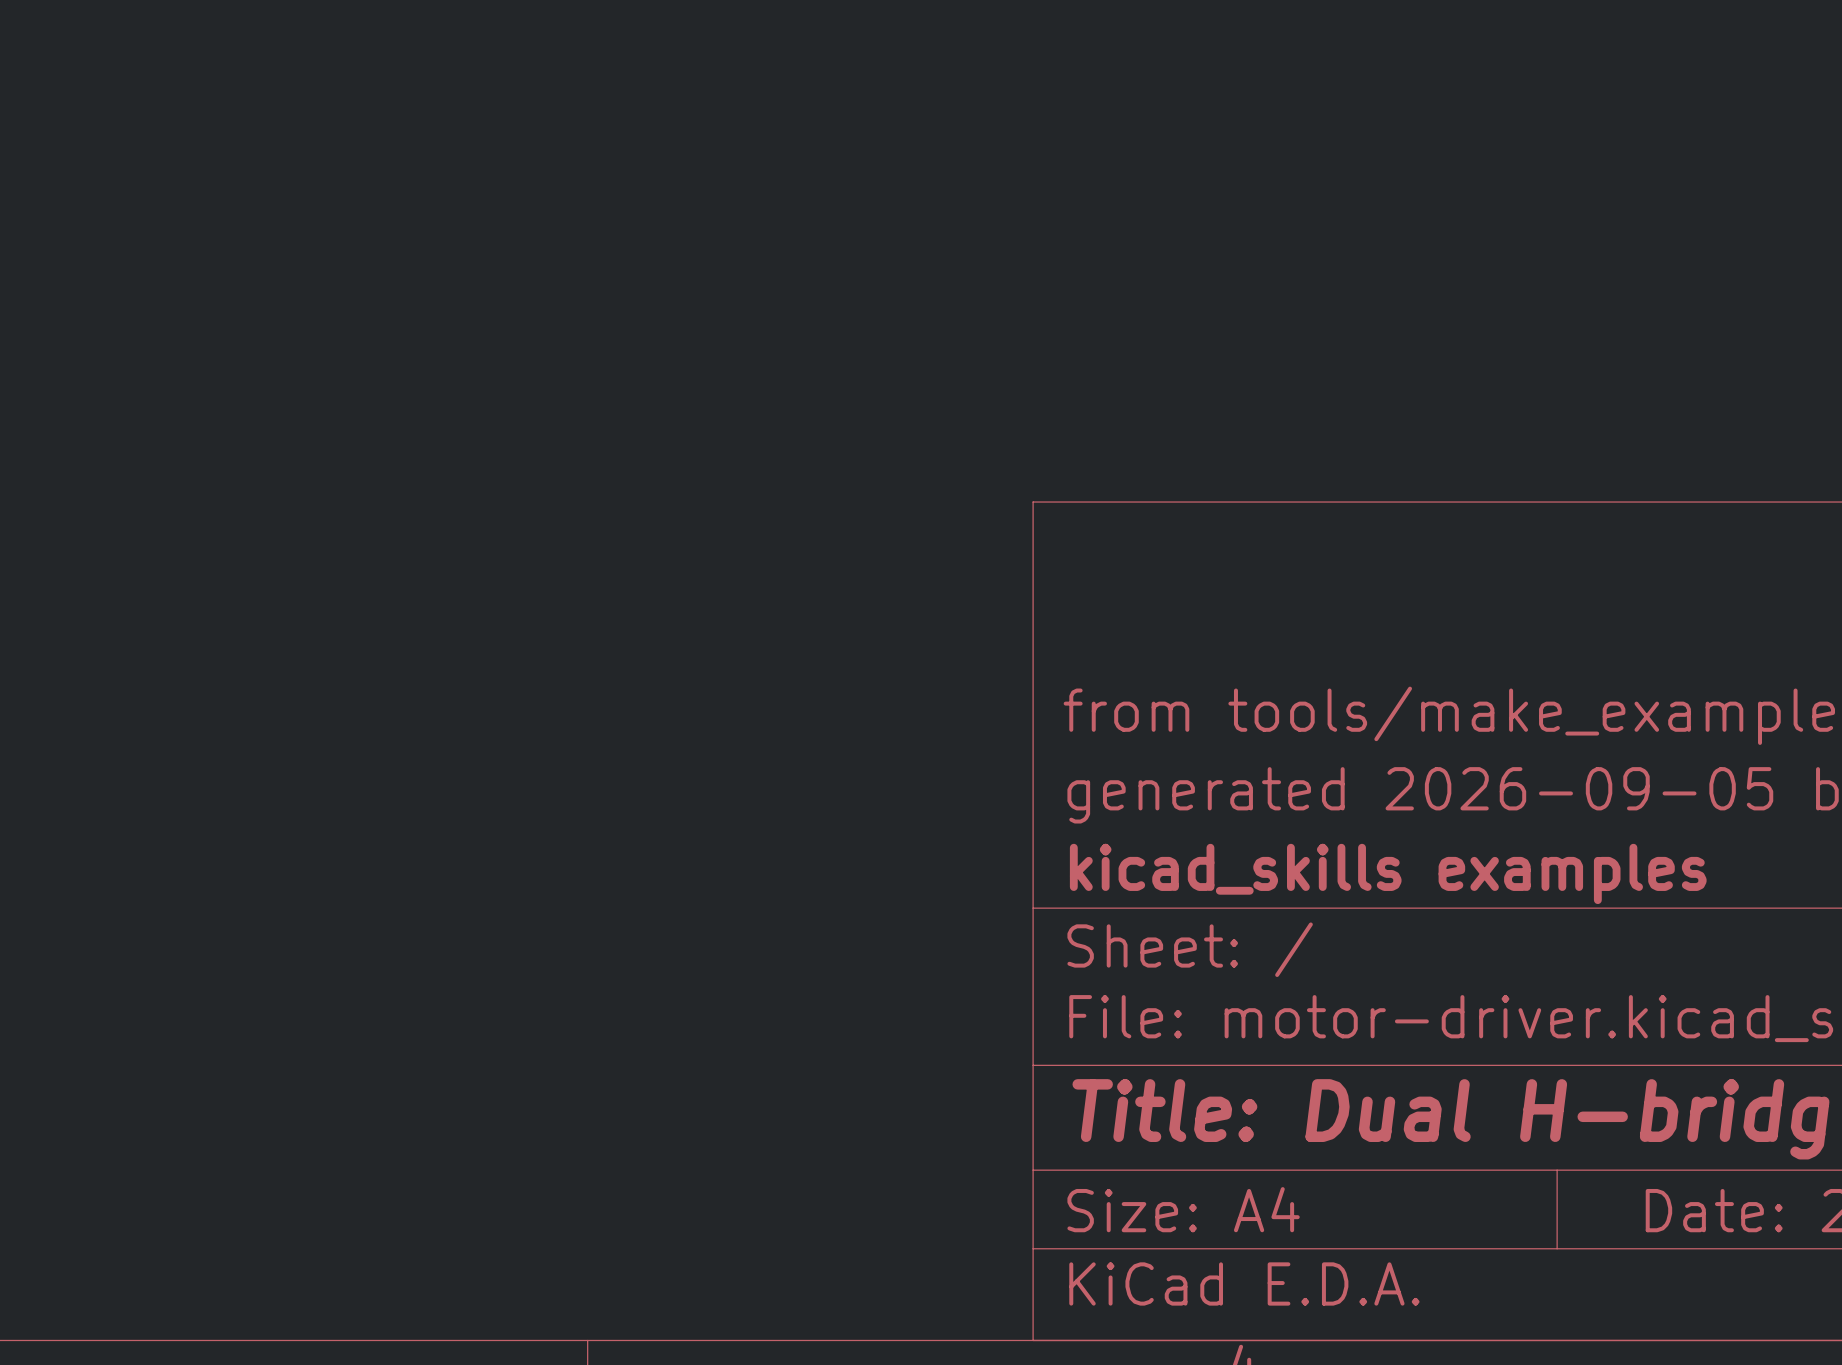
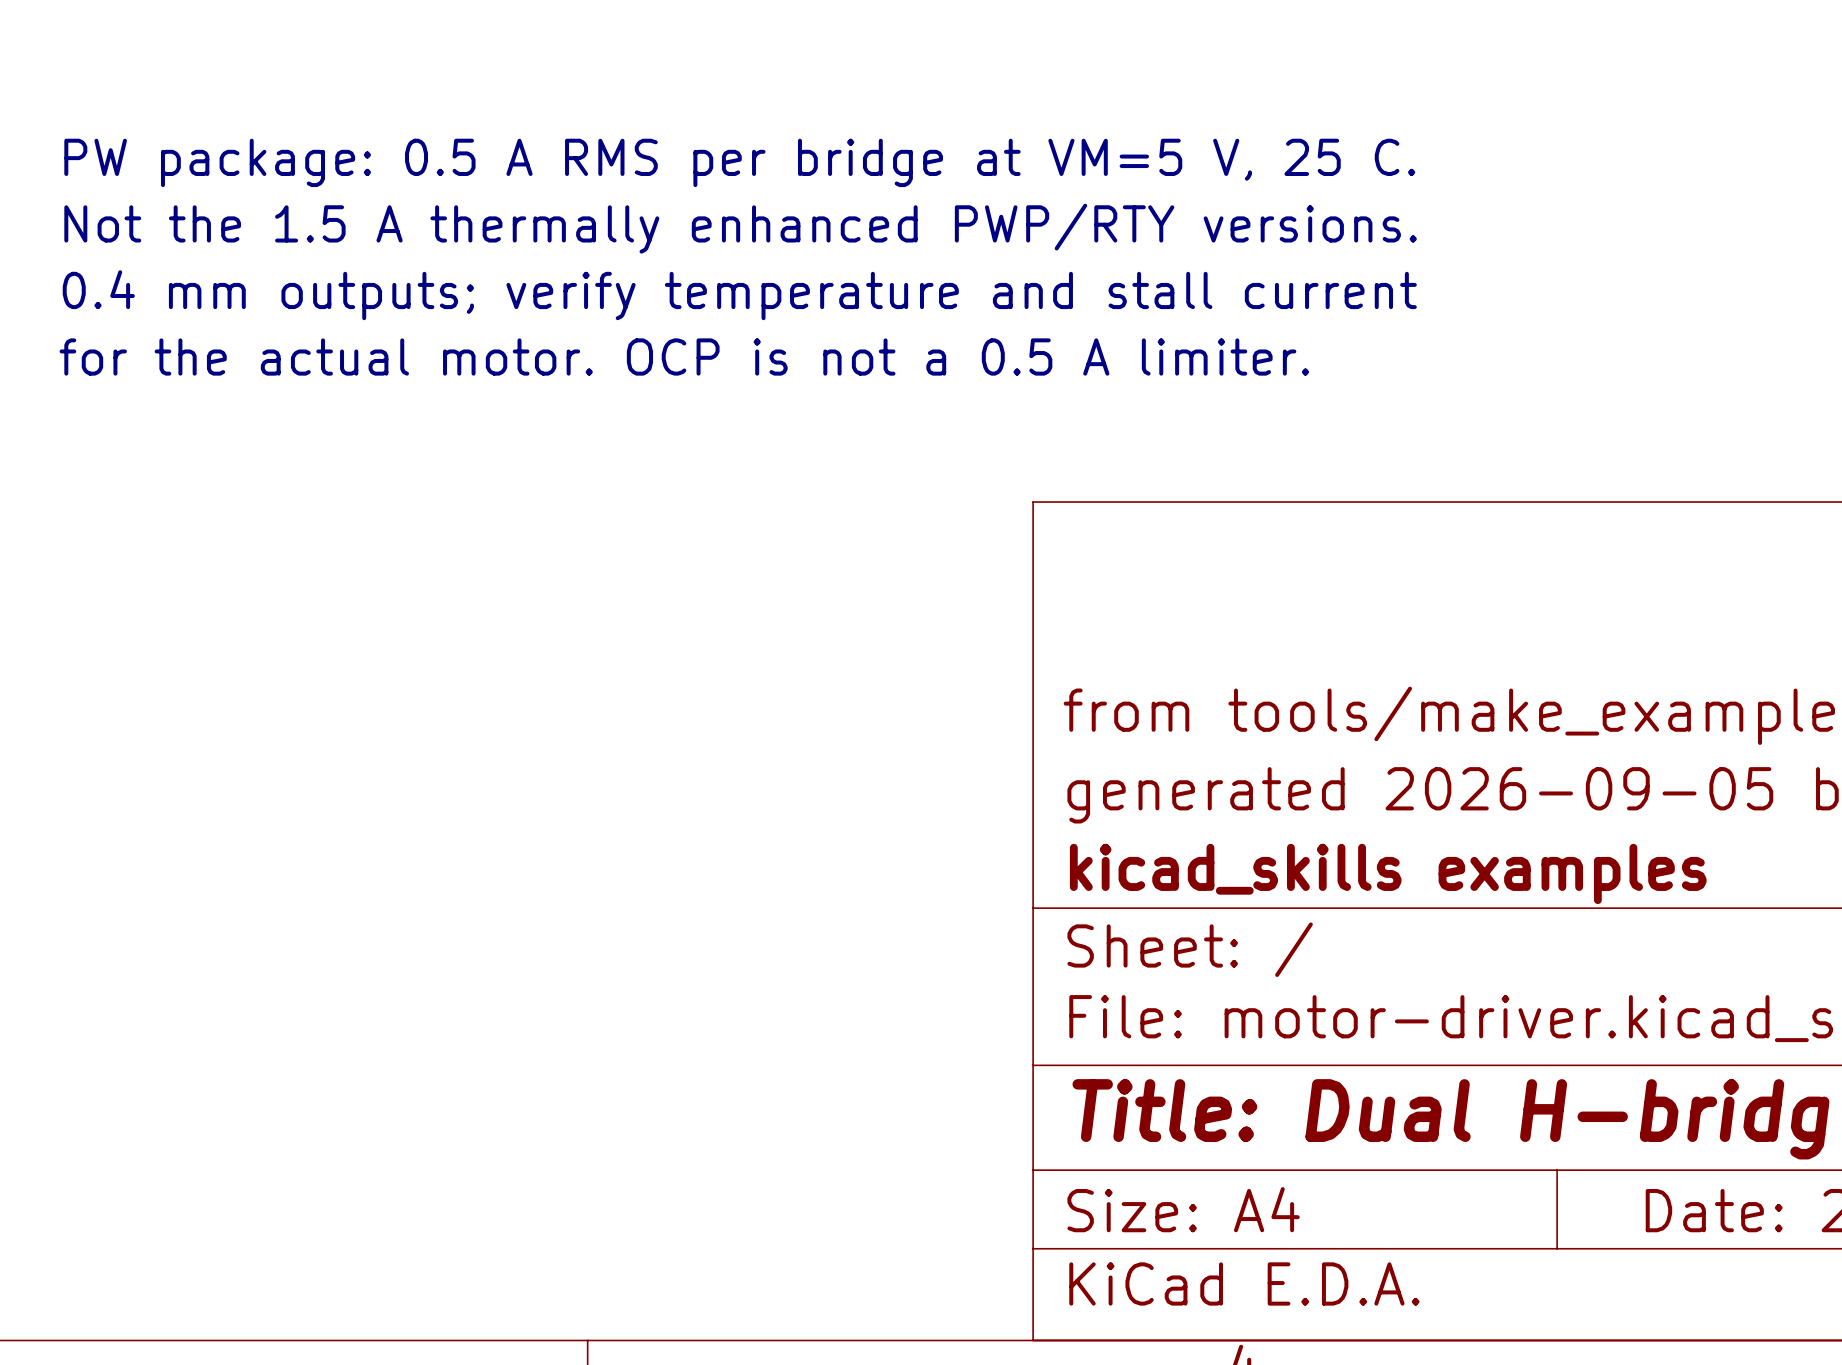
text: none -> PW package: 0.5 A RMS per bridge at VM=5 V, 25 C. (739, 162)
text: none -> Not the 1.5 A thermally enhanced PWP/RTY versions. (740, 228)
text: none -> 0.4 mm outputs; verify temperature and stall current (739, 295)
text: none -> for the actual motor. OCP is not a 0.5 A limiter. (684, 357)

